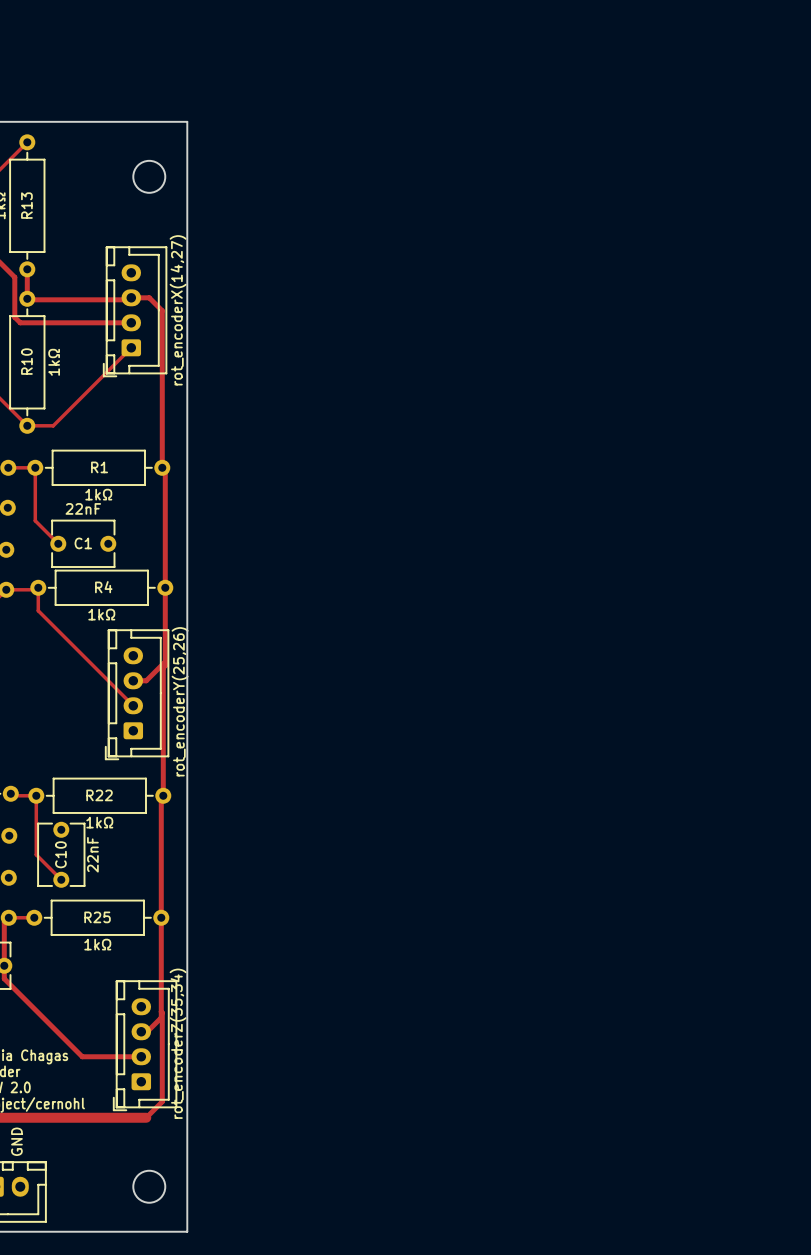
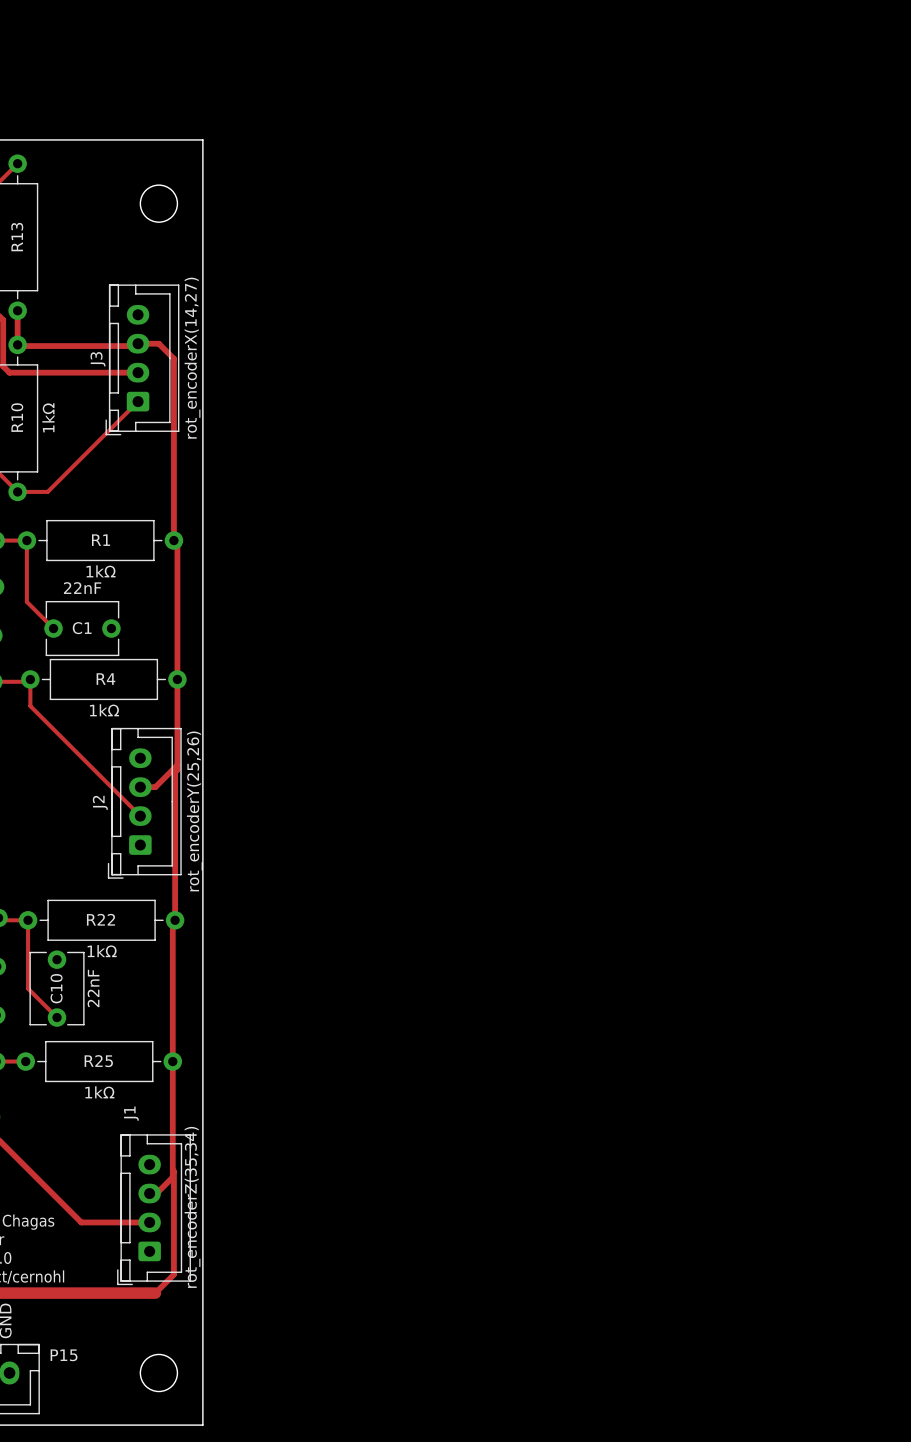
J3 name: none -> J3 (98, 359)
J2 name: none -> J2 (100, 802)
J1 name: none -> J1 (131, 1113)
P15 name: none -> P15 (64, 1355)

